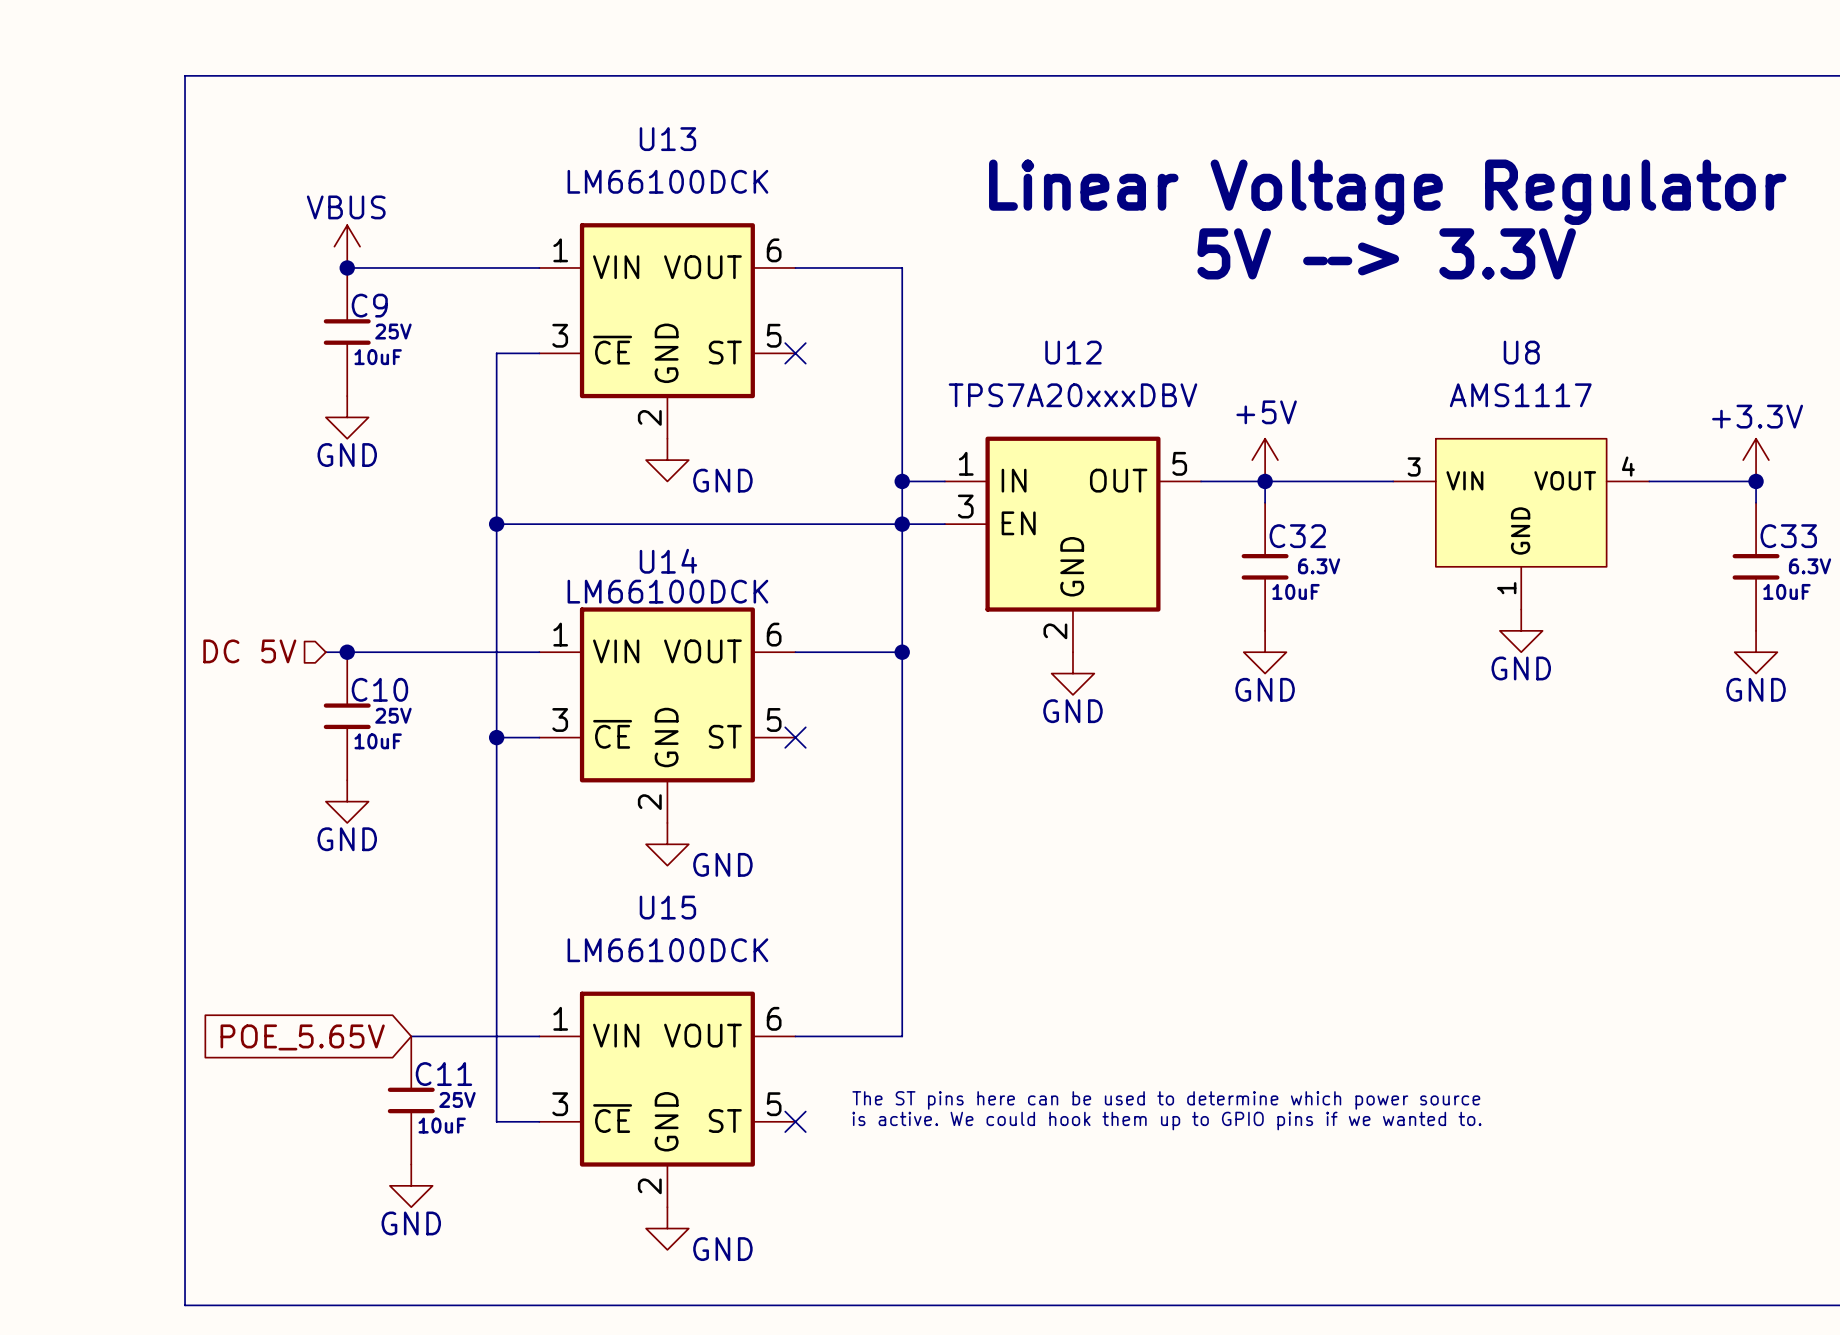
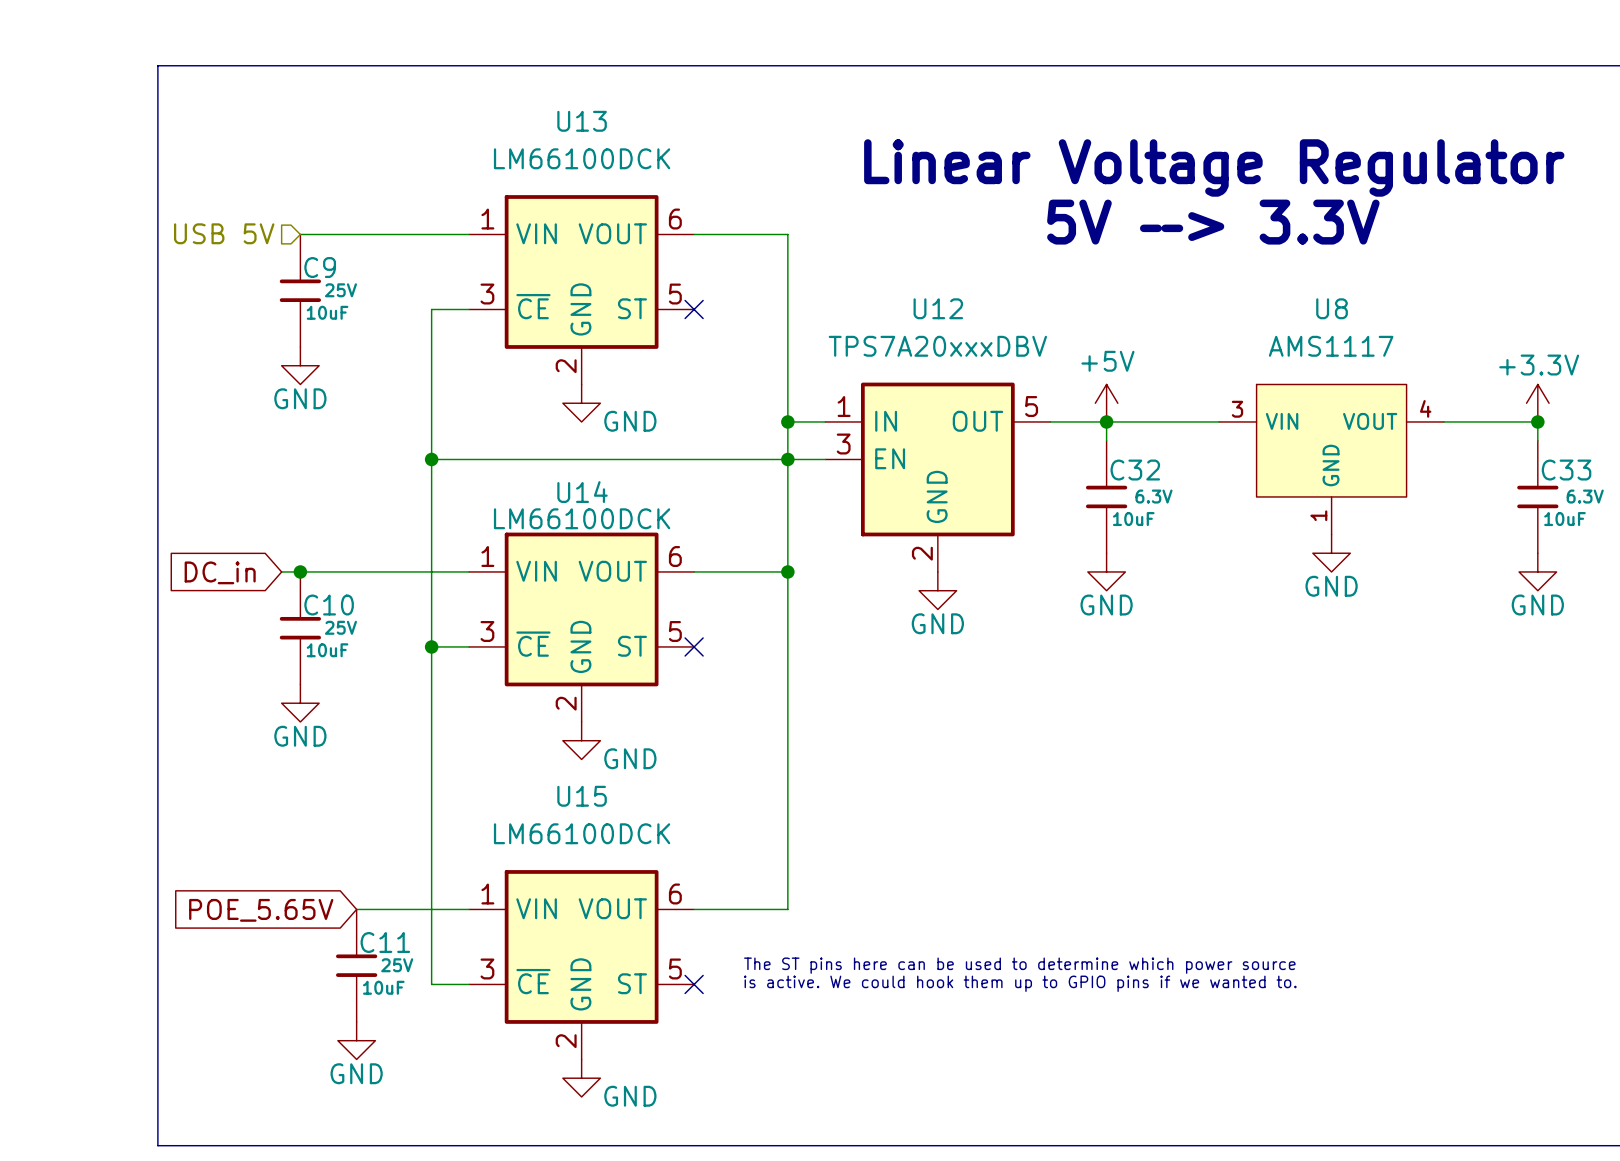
power symbol: VBUS (347, 246) -> none
hierarchical label: none -> USB 5V (224, 233)
junction: (347, 267) -> none
hierarchical label: DC 5V (249, 651) -> none
global label: none -> DC_in (220, 572)

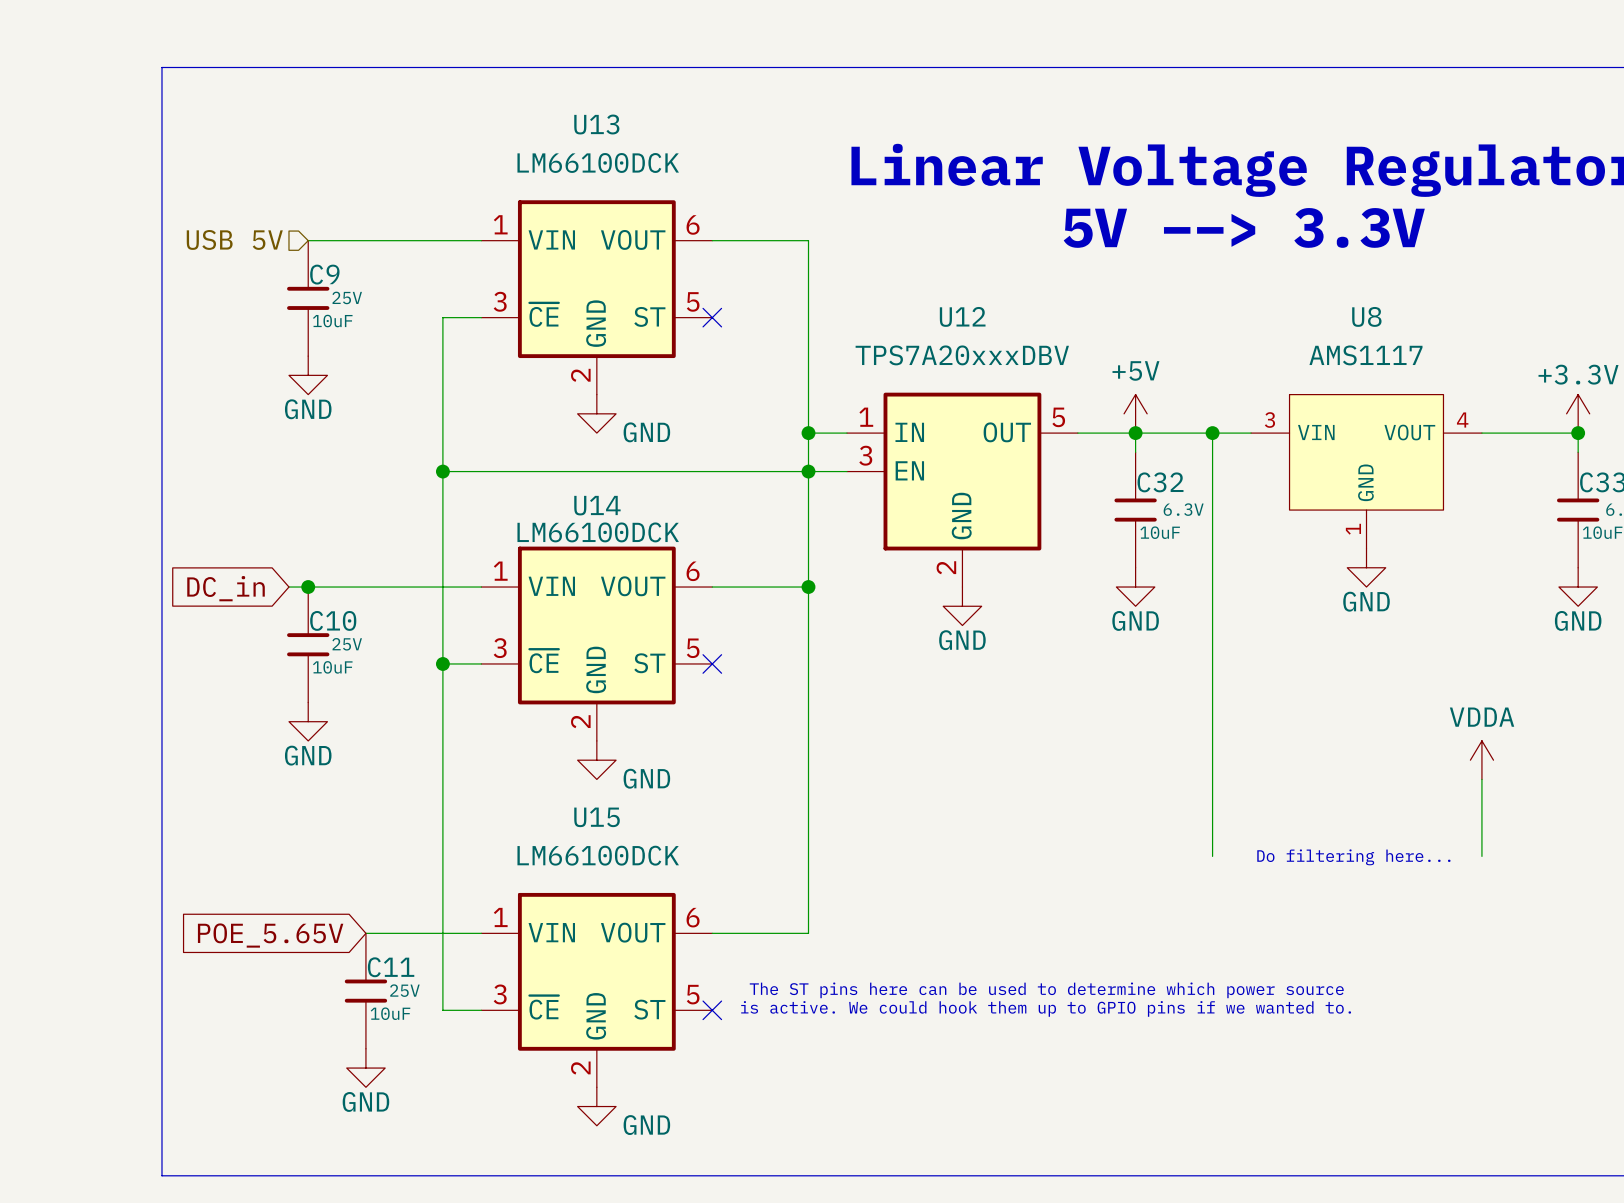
wire: none -> (1212, 433) (1212, 856)
junction: none -> (1212, 433)
power symbol: none -> VDDA (1481, 760)
wire: none -> (1481, 779) (1481, 856)
text: none -> Do filtering here... (1353, 857)

